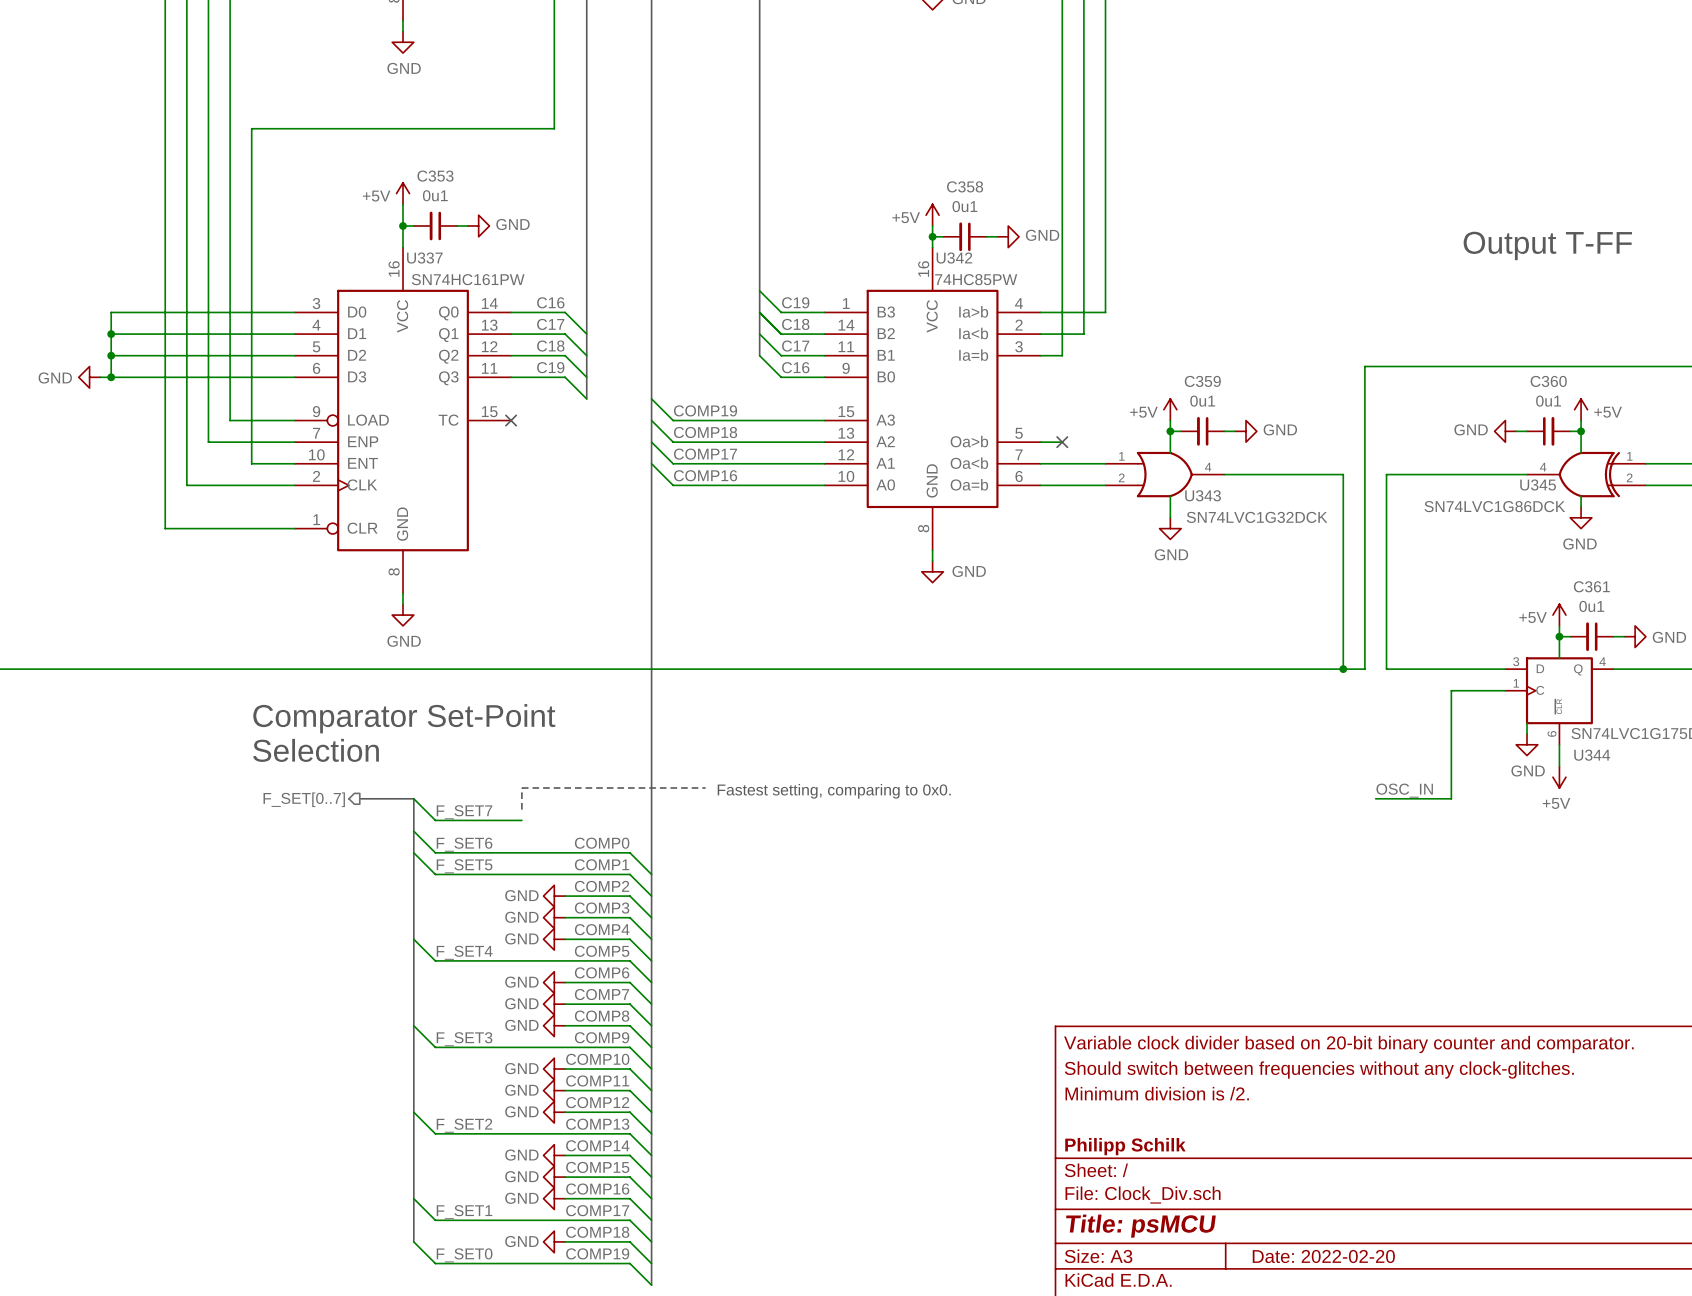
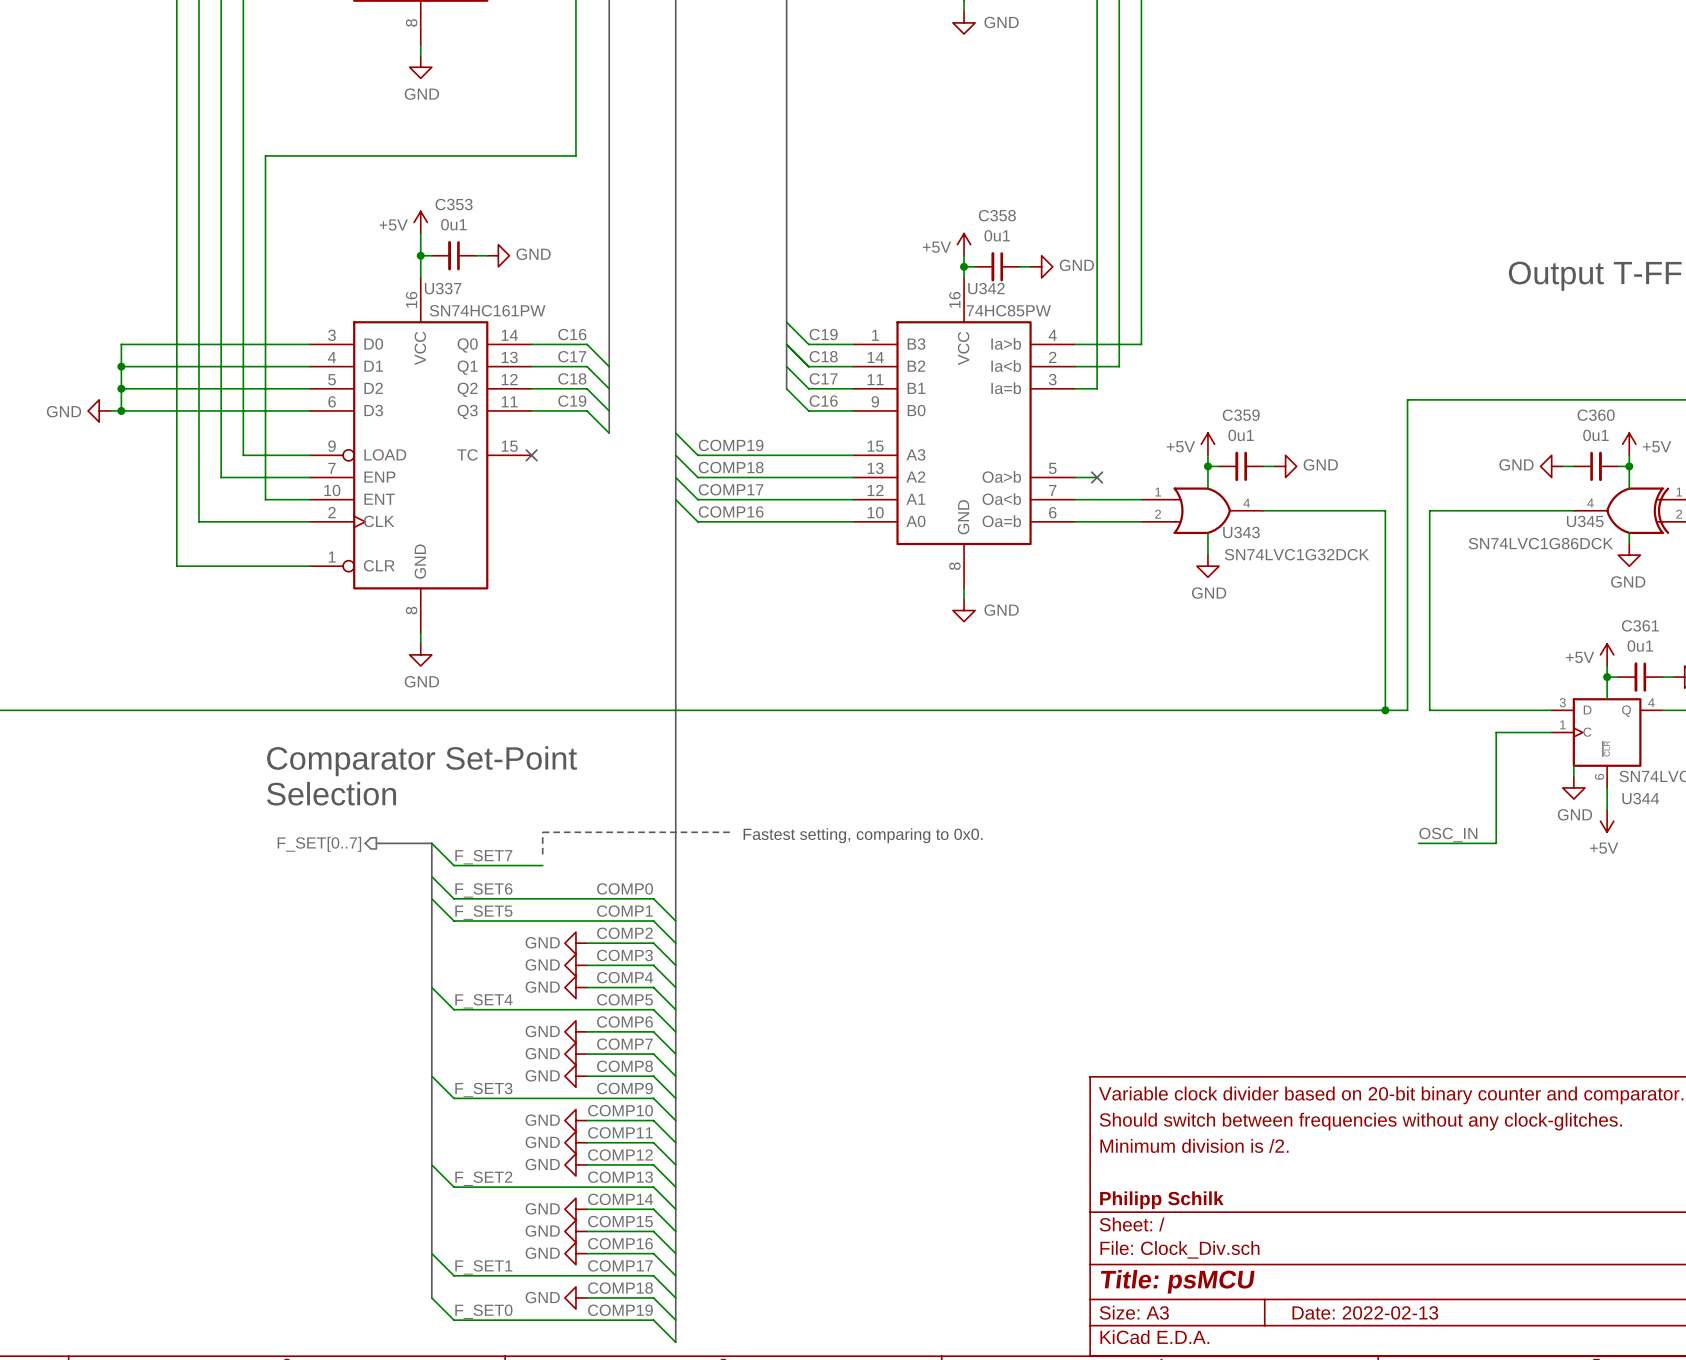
title block: Date: 2022-02-20 (1323, 1256) -> Date: 2022-02-13 (1365, 1312)

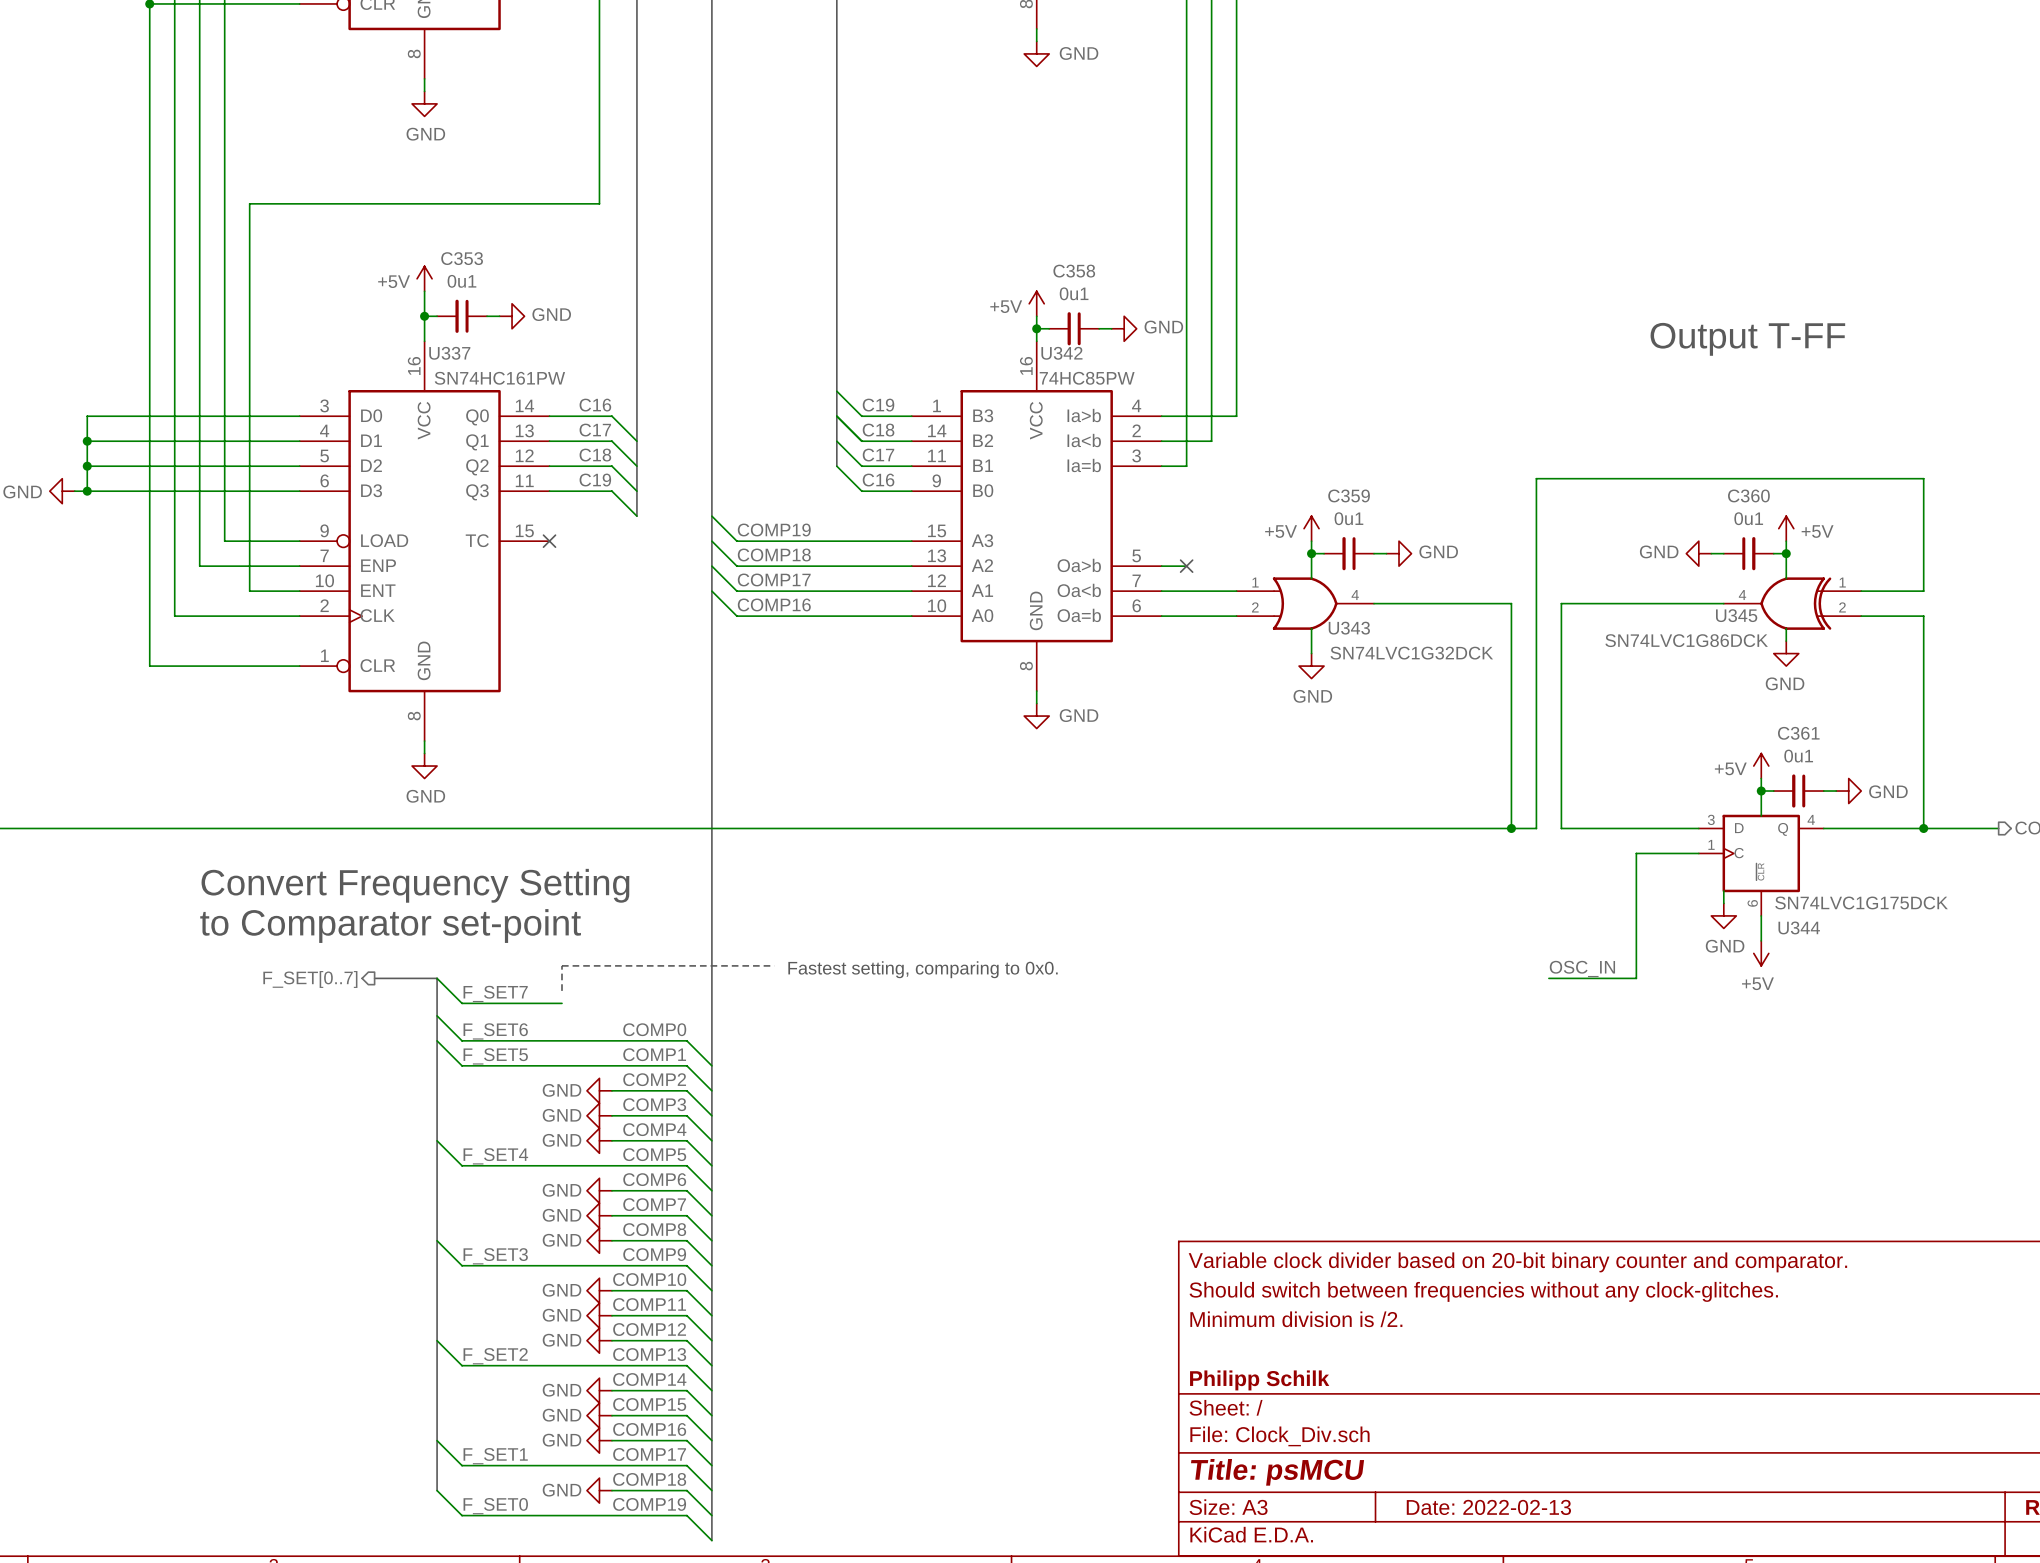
text: none -> Convert Frequency Setting (415, 885)
text: Comparator Set-Point (422, 761) -> to Comparator set-point (390, 926)
text: Selection (331, 793) -> none

